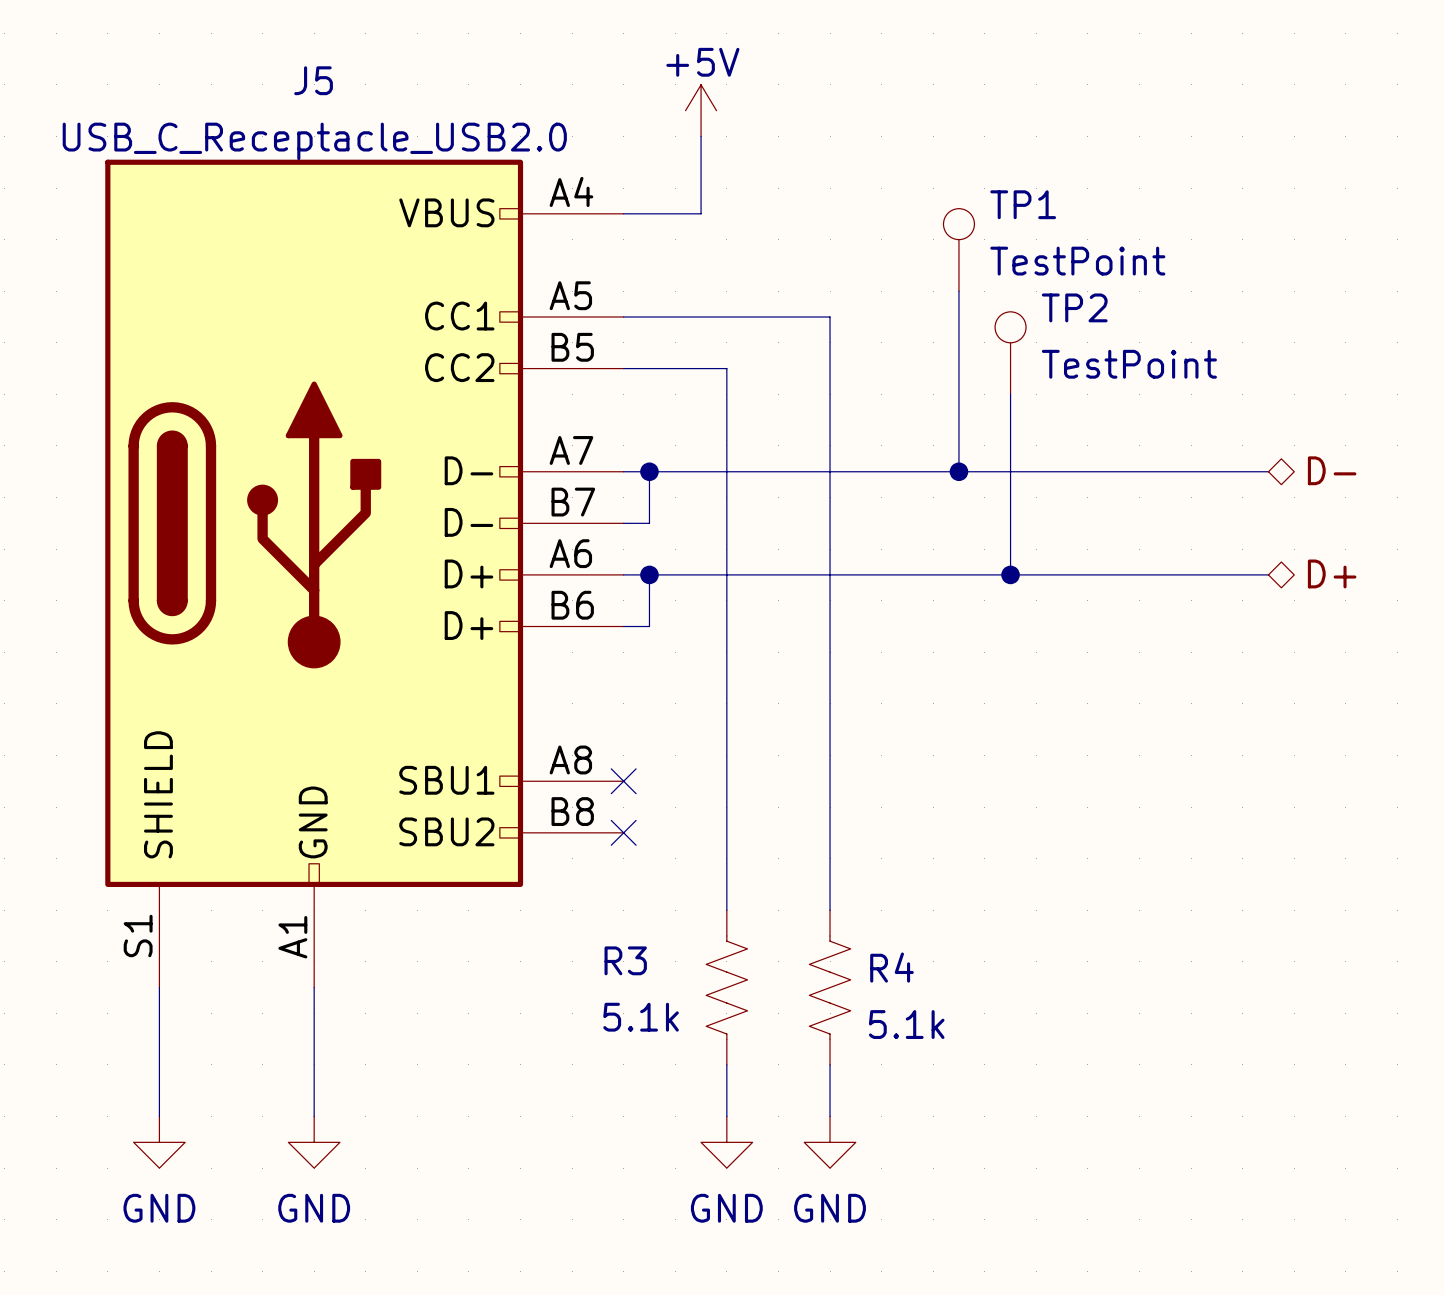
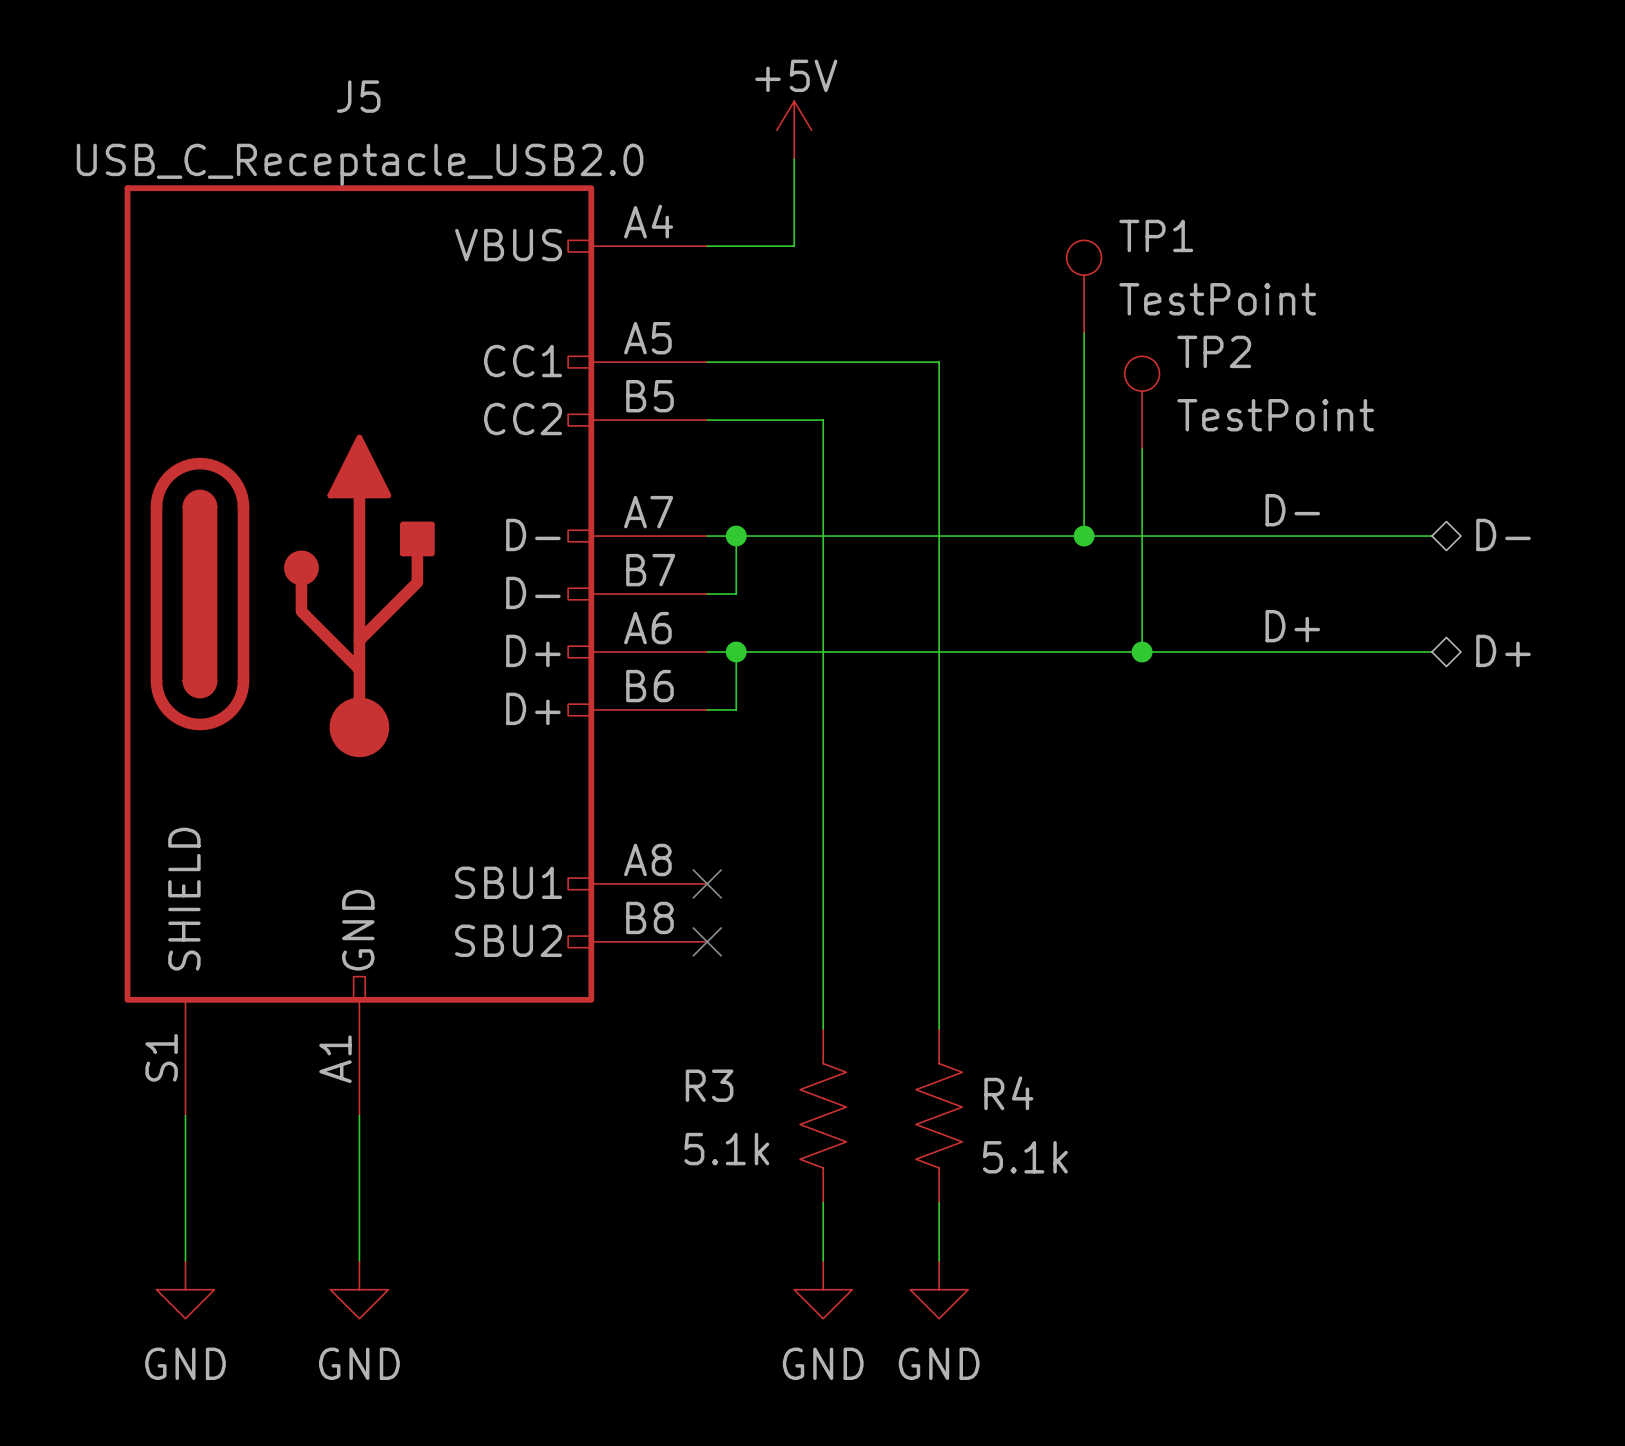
label: none -> D- (1292, 510)
label: none -> D+ (1292, 626)

